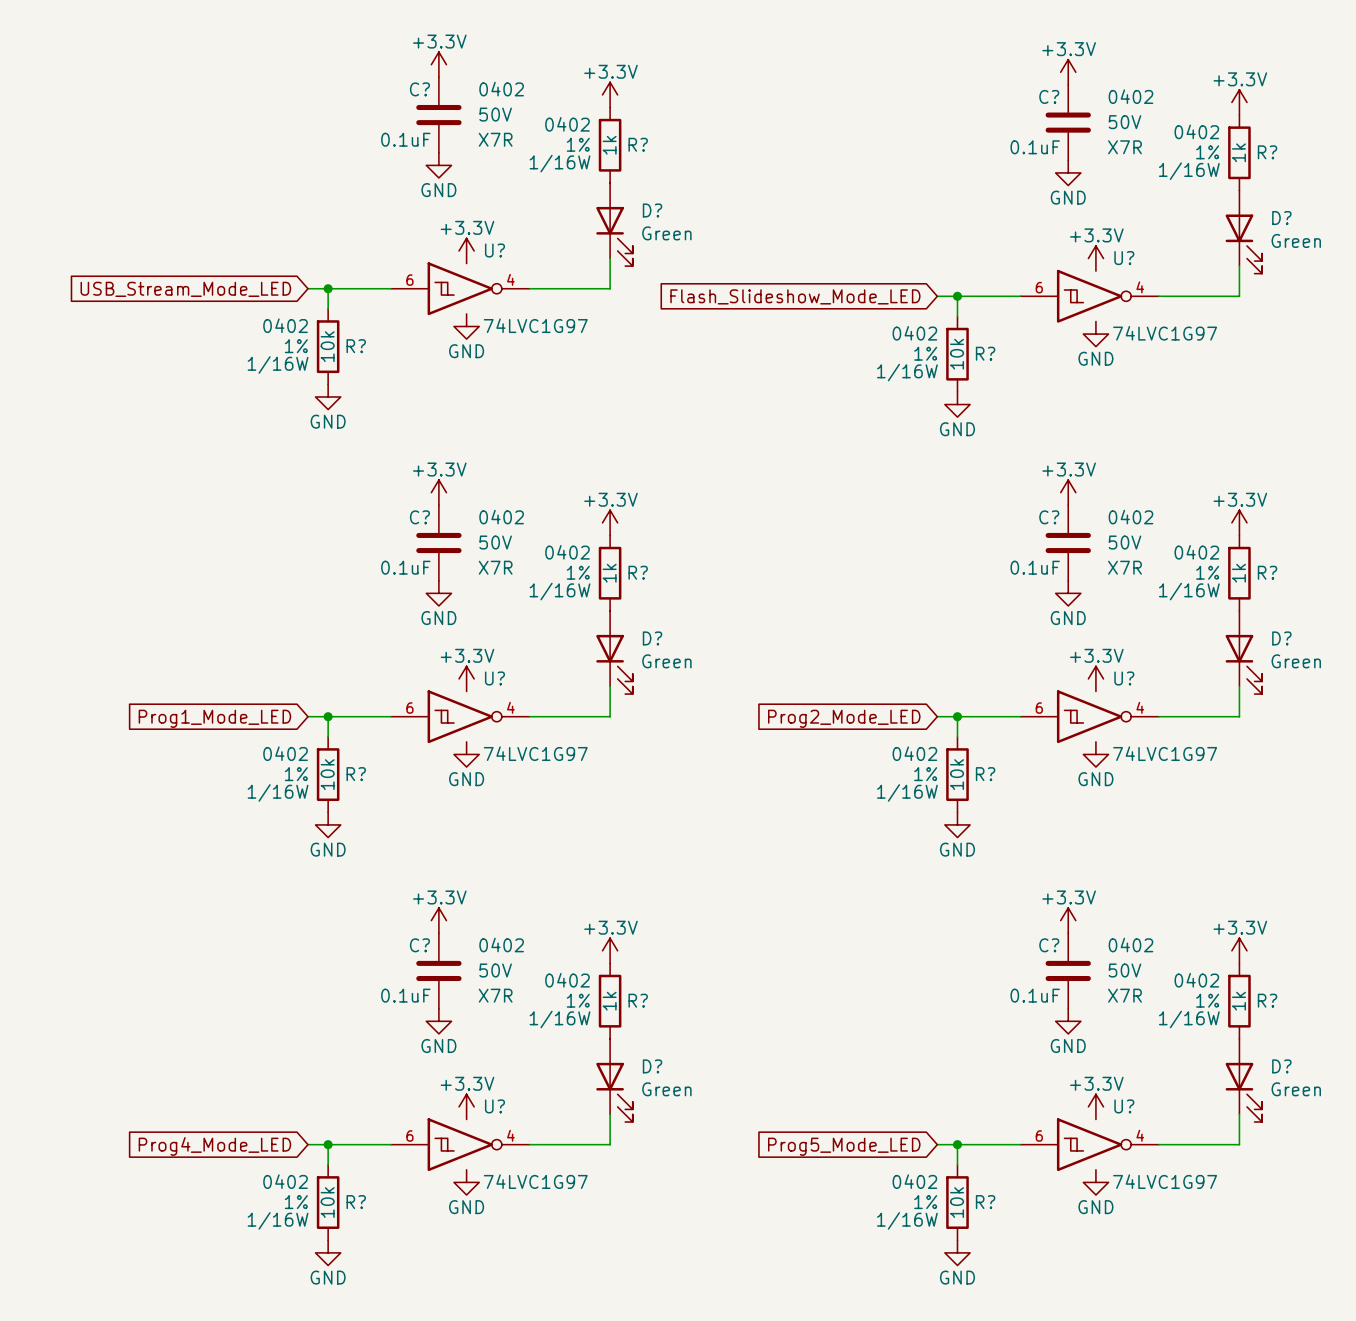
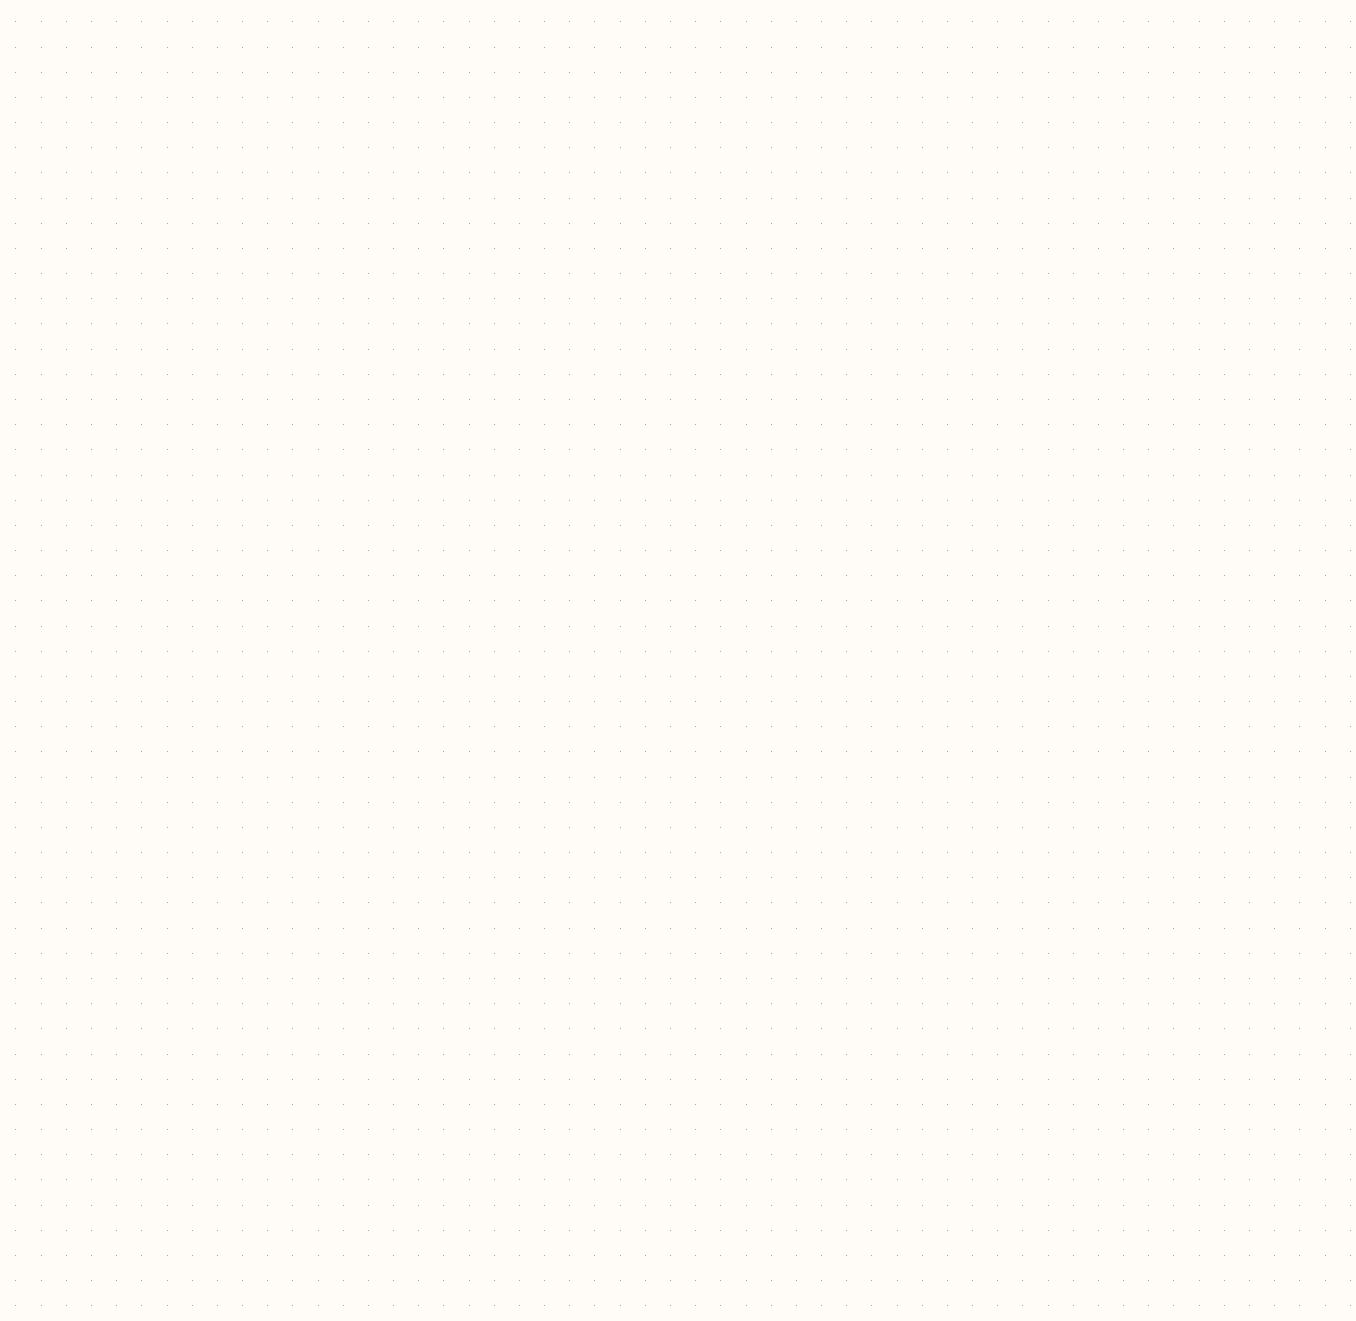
power symbol: +3.3V (438, 64) -> none
power symbol: +3.3V (1068, 72) -> none
power symbol: +3.3V (610, 94) -> none
power symbol: +3.3V (1239, 102) -> none
C?: 0.1uF (438, 115) -> none
C?: 0.1uF (1068, 122) -> none
R?: 1k (610, 145) -> none
R?: 1k (1239, 152) -> none
power symbol: GND (438, 165) -> none
power symbol: GND (1068, 172) -> none
D?: Green (614, 224) -> none
D?: Green (1243, 232) -> none
power symbol: +3.3V (466, 250) -> none
wire: (610, 258) (610, 288) (529, 288) -> none
power symbol: +3.3V (1095, 258) -> none
wire: (1239, 266) (1239, 296) (1158, 296) -> none
wire: (308, 288) (391, 288) -> none
wire: (328, 288) (328, 308) -> none
junction: (328, 288) -> none
U?: 74LVC1G97 (460, 288) -> none
global label: USB_Stream_Mode_LED (185, 289) -> none
global label: Flash_Slideshow_Mode_LED (795, 296) -> none
wire: (937, 296) (1020, 296) -> none
wire: (957, 296) (957, 316) -> none
junction: (957, 296) -> none
U?: 74LVC1G97 (1089, 296) -> none
power symbol: GND (466, 326) -> none
power symbol: GND (1095, 334) -> none
R?: 10k (328, 346) -> none
R?: 10k (957, 354) -> none
power symbol: GND (328, 396) -> none
power symbol: GND (957, 404) -> none
power symbol: +3.3V (438, 492) -> none
power symbol: +3.3V (1068, 492) -> none
power symbol: +3.3V (610, 522) -> none
power symbol: +3.3V (1239, 522) -> none
C?: 0.1uF (438, 543) -> none
C?: 0.1uF (1068, 543) -> none
R?: 1k (610, 573) -> none
R?: 1k (1239, 573) -> none
power symbol: GND (438, 593) -> none
power symbol: GND (1068, 593) -> none
D?: Green (614, 652) -> none
D?: Green (1243, 652) -> none
power symbol: +3.3V (466, 678) -> none
power symbol: +3.3V (1095, 678) -> none
wire: (610, 686) (610, 716) (529, 716) -> none
wire: (1239, 686) (1239, 716) (1158, 716) -> none
wire: (308, 716) (391, 716) -> none
wire: (328, 716) (328, 736) -> none
junction: (328, 716) -> none
U?: 74LVC1G97 (460, 716) -> none
wire: (937, 716) (1020, 716) -> none
wire: (957, 716) (957, 736) -> none
junction: (957, 716) -> none
U?: 74LVC1G97 (1089, 716) -> none
global label: Prog1_Mode_LED (214, 718) -> none
global label: Prog2_Mode_LED (844, 718) -> none
power symbol: GND (466, 754) -> none
power symbol: GND (1095, 754) -> none
R?: 10k (328, 774) -> none
R?: 10k (957, 774) -> none
power symbol: GND (328, 824) -> none
power symbol: GND (957, 824) -> none
power symbol: +3.3V (438, 920) -> none
power symbol: +3.3V (1068, 920) -> none
power symbol: +3.3V (610, 950) -> none
power symbol: +3.3V (1239, 950) -> none
C?: 0.1uF (438, 970) -> none
C?: 0.1uF (1068, 970) -> none
R?: 1k (610, 1001) -> none
R?: 1k (1239, 1001) -> none
power symbol: GND (438, 1021) -> none
power symbol: GND (1068, 1021) -> none
D?: Green (614, 1080) -> none
D?: Green (1243, 1080) -> none
power symbol: +3.3V (466, 1106) -> none
power symbol: +3.3V (1095, 1106) -> none
wire: (610, 1114) (610, 1144) (529, 1144) -> none
wire: (1239, 1114) (1239, 1144) (1158, 1144) -> none
wire: (308, 1144) (391, 1144) -> none
wire: (328, 1144) (328, 1164) -> none
junction: (328, 1144) -> none
U?: 74LVC1G97 (460, 1144) -> none
wire: (937, 1144) (1020, 1144) -> none
wire: (957, 1144) (957, 1164) -> none
junction: (957, 1144) -> none
U?: 74LVC1G97 (1089, 1144) -> none
global label: Prog4_Mode_LED (214, 1146) -> none
global label: Prog5_Mode_LED (844, 1146) -> none
power symbol: GND (466, 1182) -> none
power symbol: GND (1095, 1182) -> none
R?: 10k (328, 1202) -> none
R?: 10k (957, 1202) -> none
power symbol: GND (328, 1252) -> none
power symbol: GND (957, 1252) -> none

